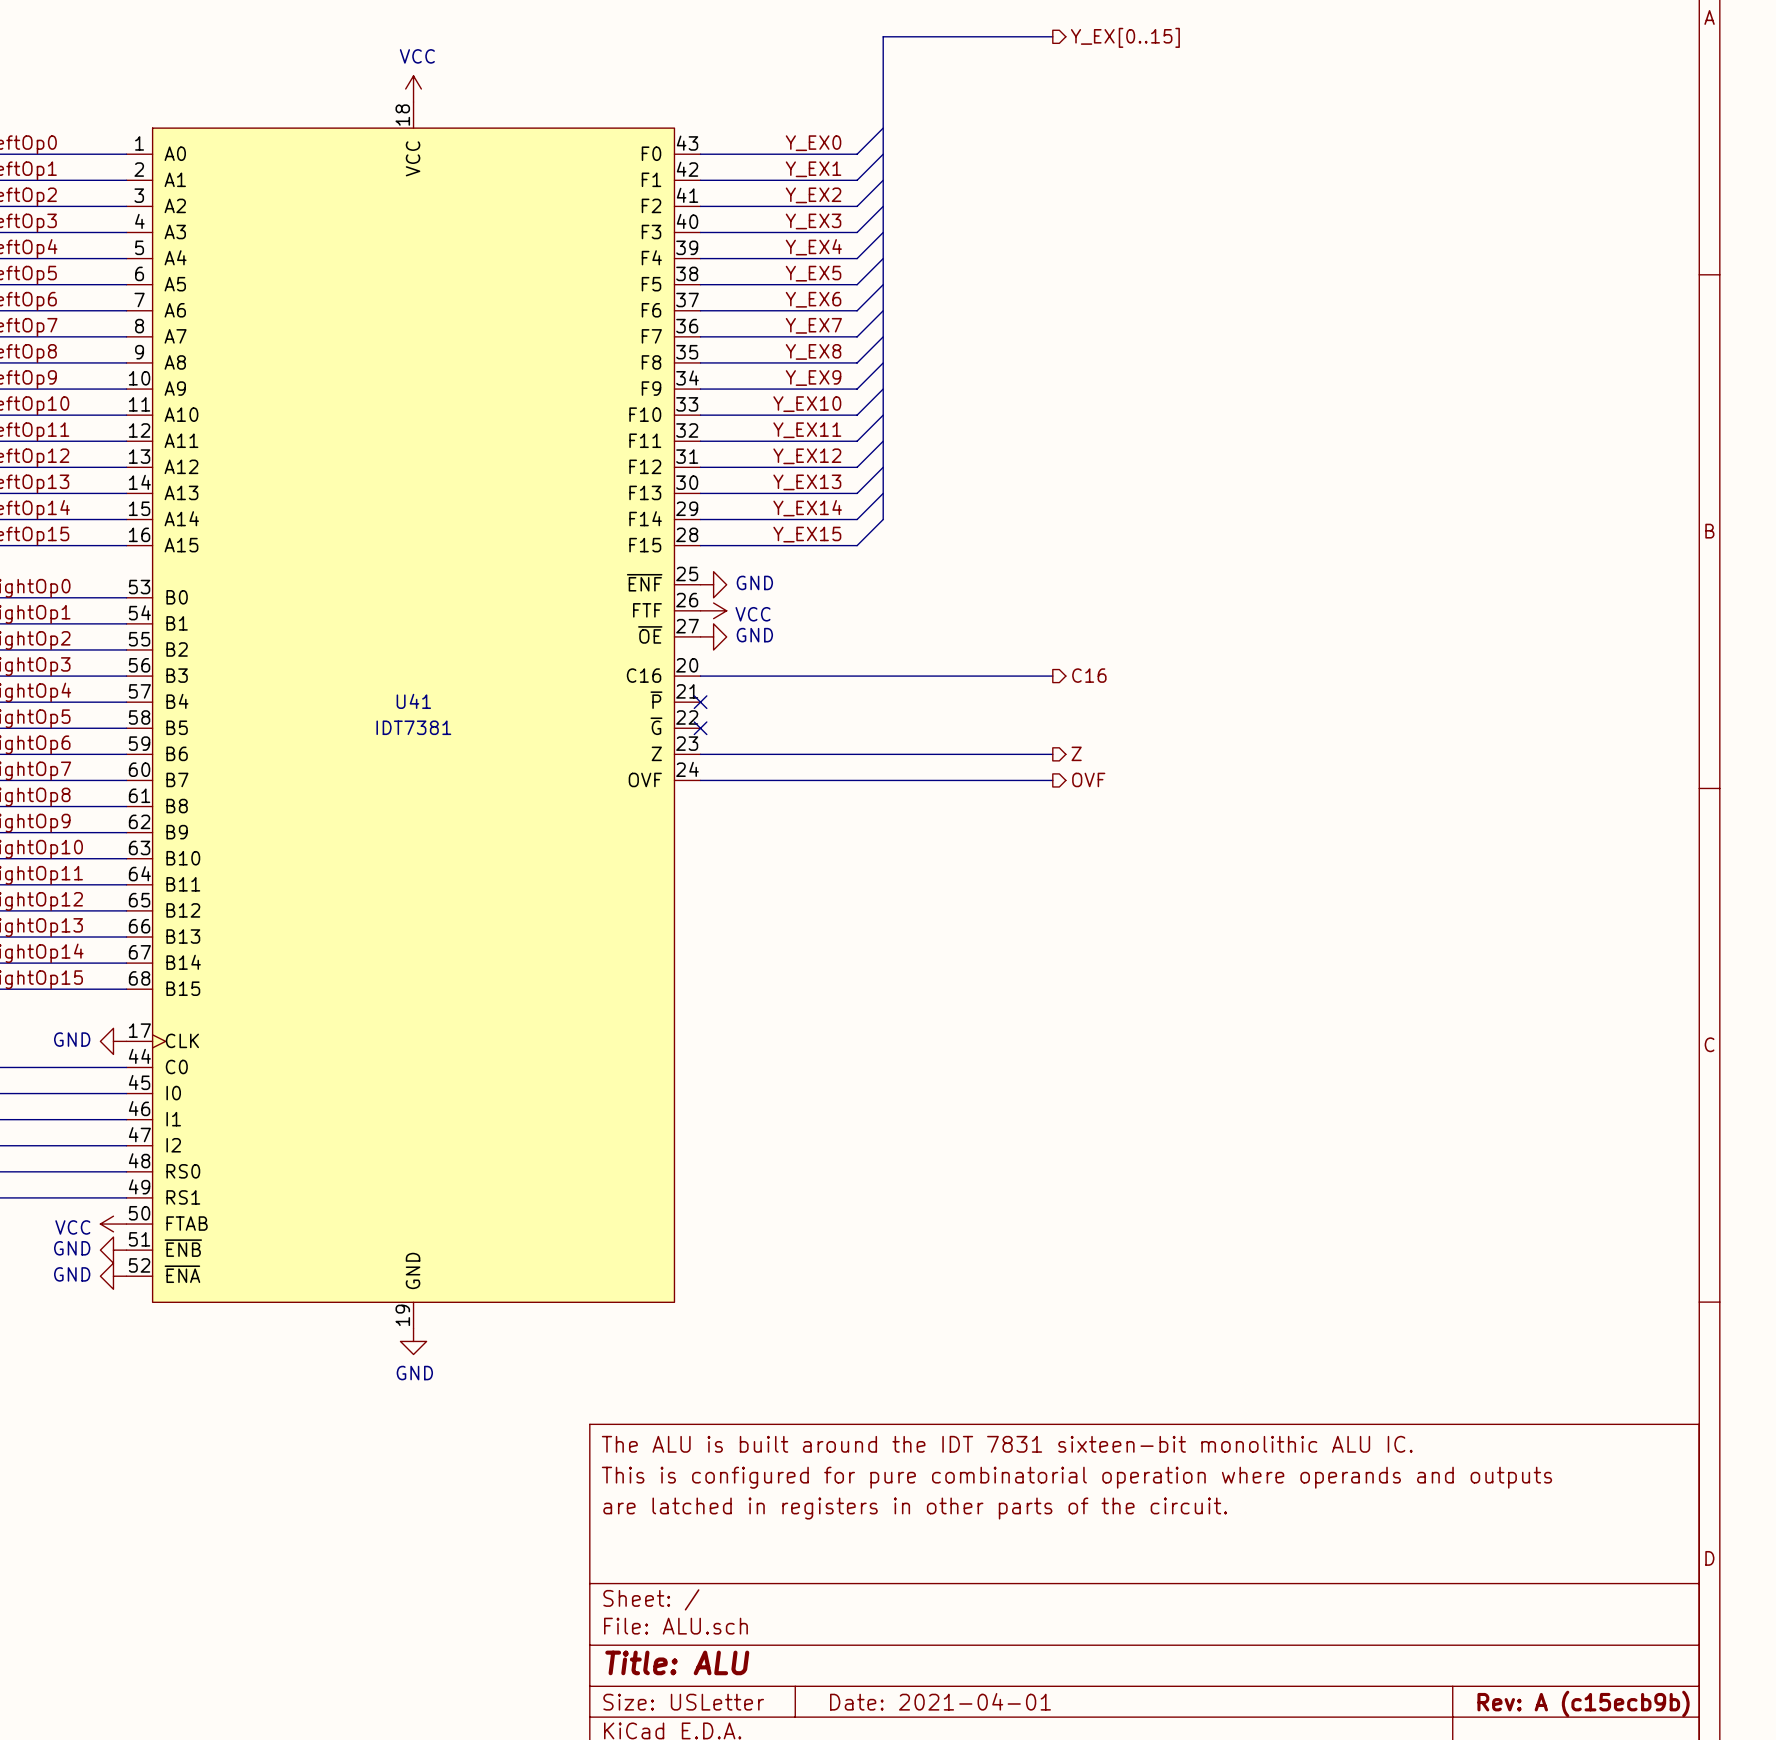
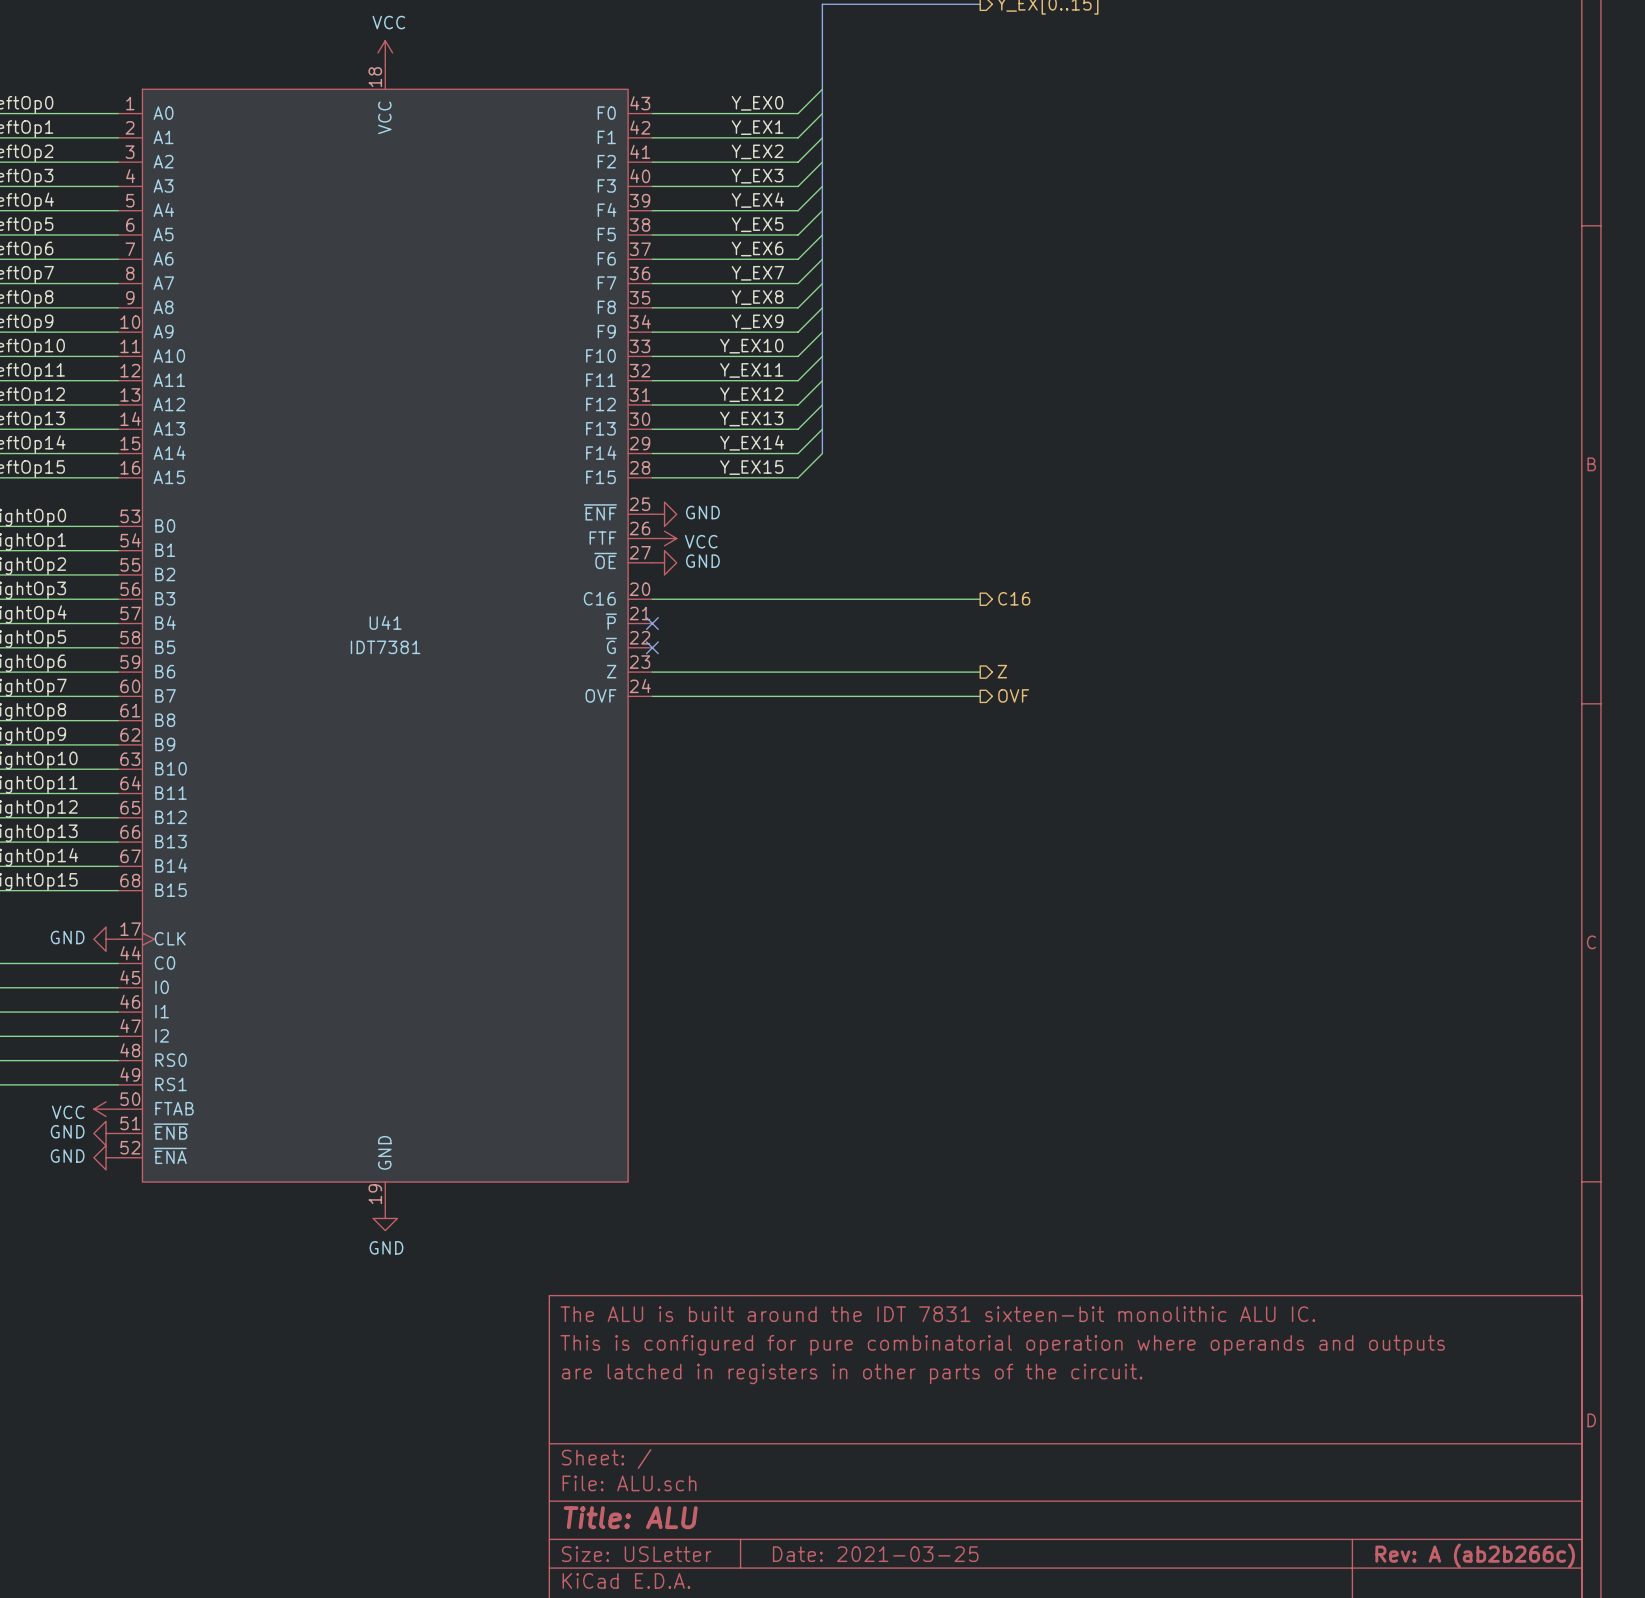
title block: Date: 2021-04-01 (940, 1701) -> Date: 2021-03-25 (875, 1554)
title block: Rev: A (c15ecb9b) (1583, 1703) -> Rev: A (ab2b266c) (1475, 1555)

